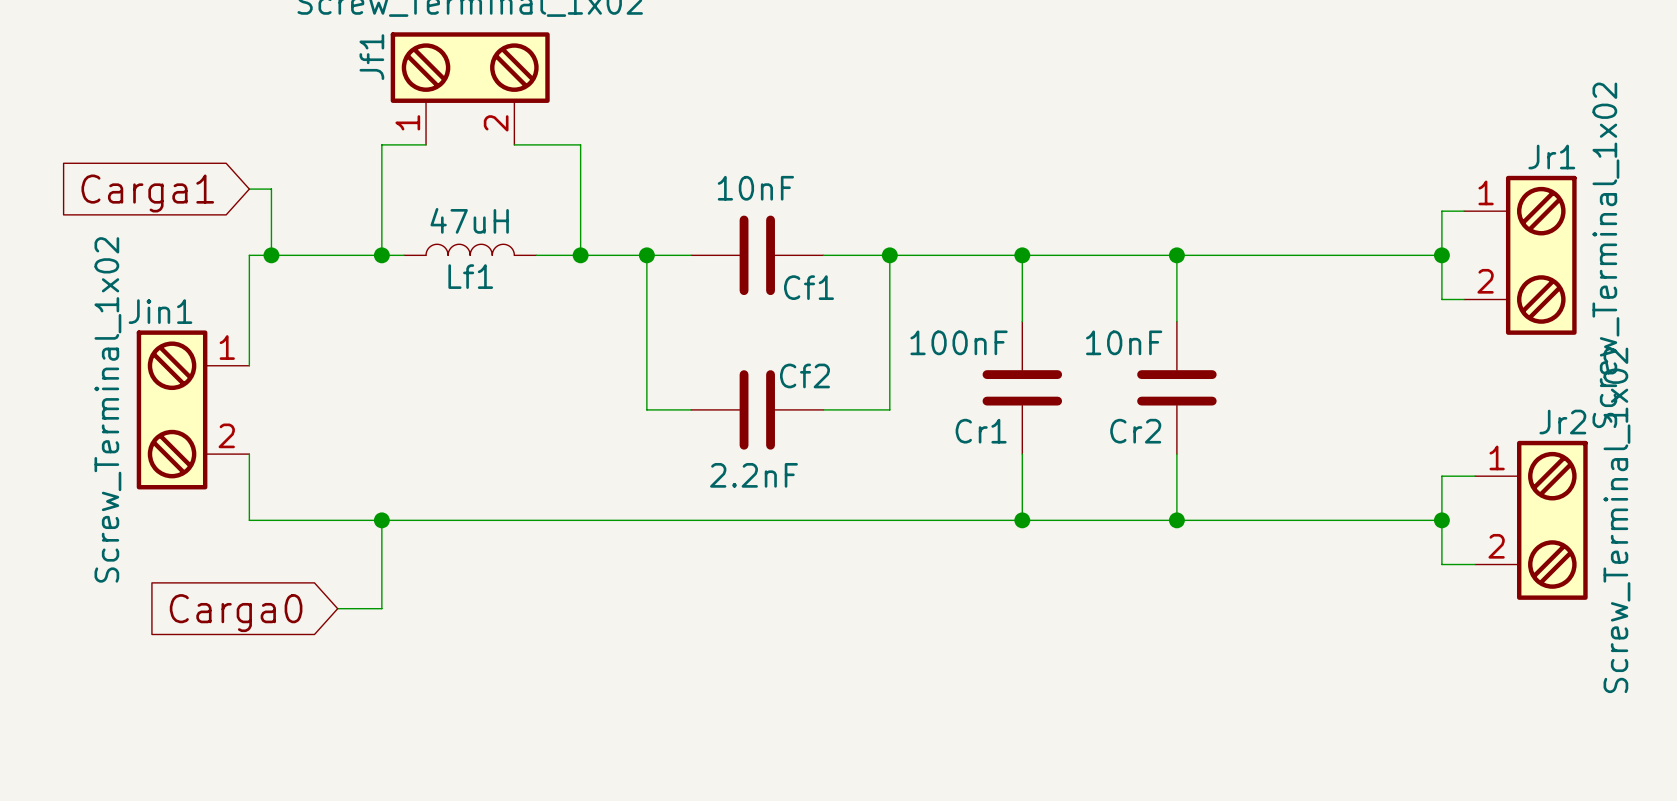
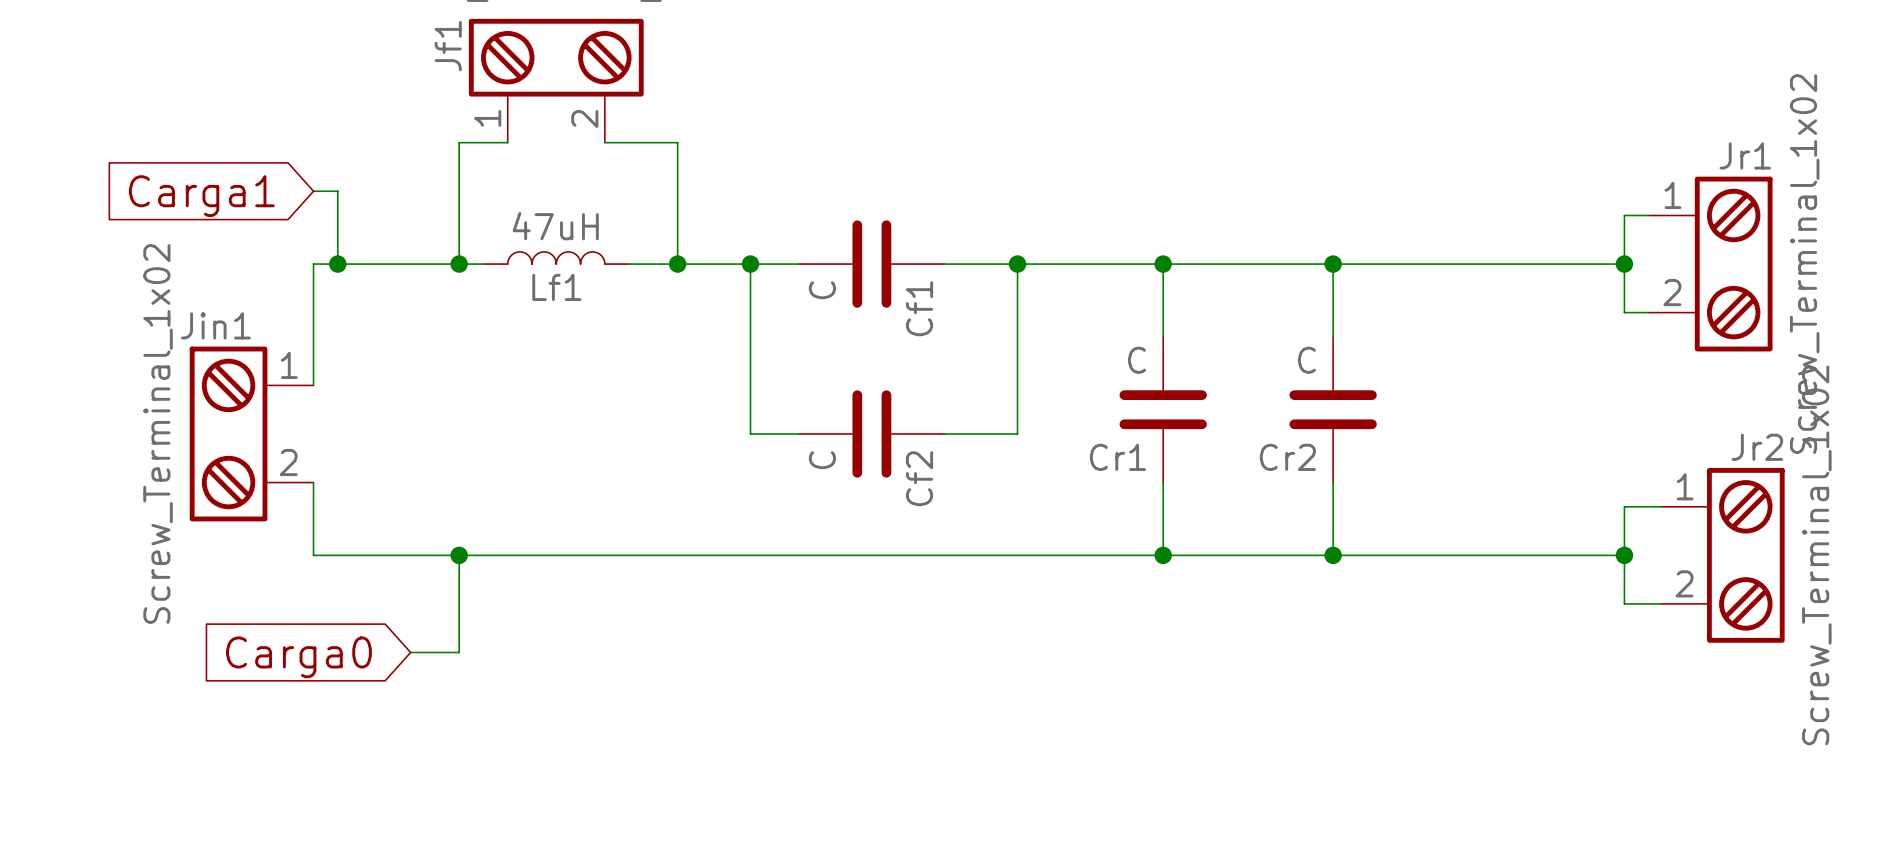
Cf1 value: 10nF (755, 188) -> C (822, 290)
Cf1 name rotation: 0° (808, 287) -> 90° counterclockwise (919, 308)
Cr1 value: 100nF (959, 342) -> C (1137, 360)
Cr2 value: 10nF (1124, 342) -> C (1306, 360)
Cf2 name rotation: 0° (804, 375) -> 90° counterclockwise (919, 478)
Cf2 name position: Cf2 (804, 375) -> Cf2 (919, 478)
Cf2 value: 2.2nF (753, 475) -> C (822, 460)

